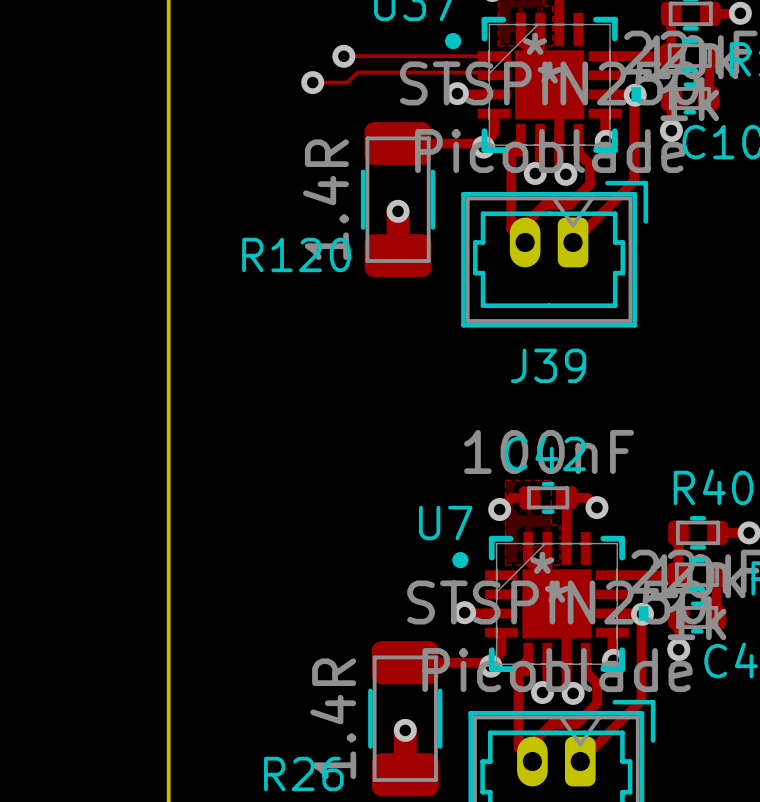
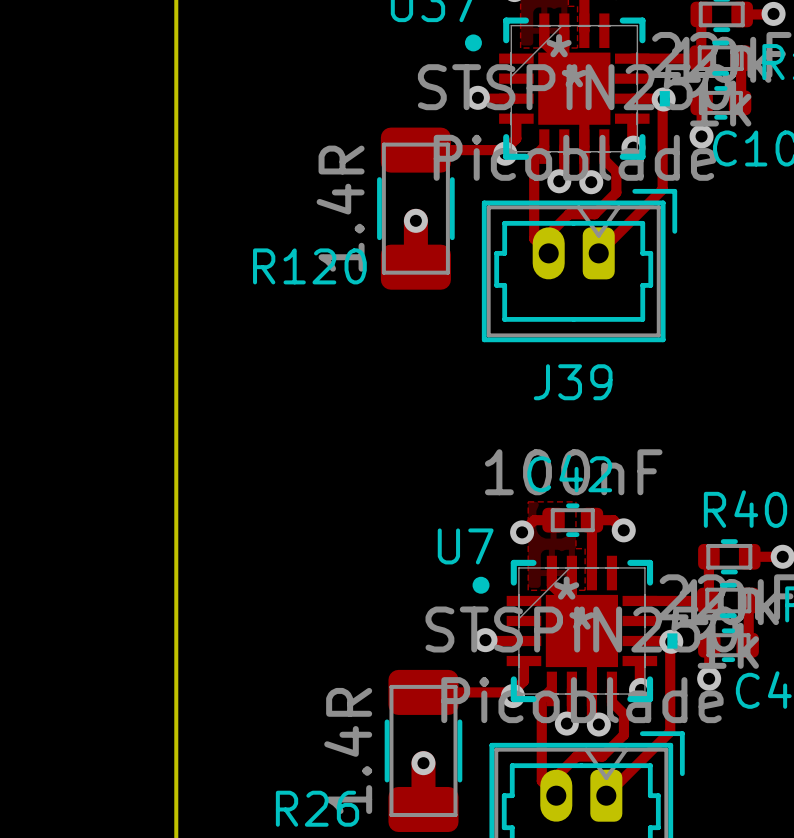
via: (343, 56) -> none
track: (344, 56) (494, 56) -> none
track: (494, 75) (491, 72) (357, 72) (347, 82) (312, 82) -> none
via: (312, 82) -> none

